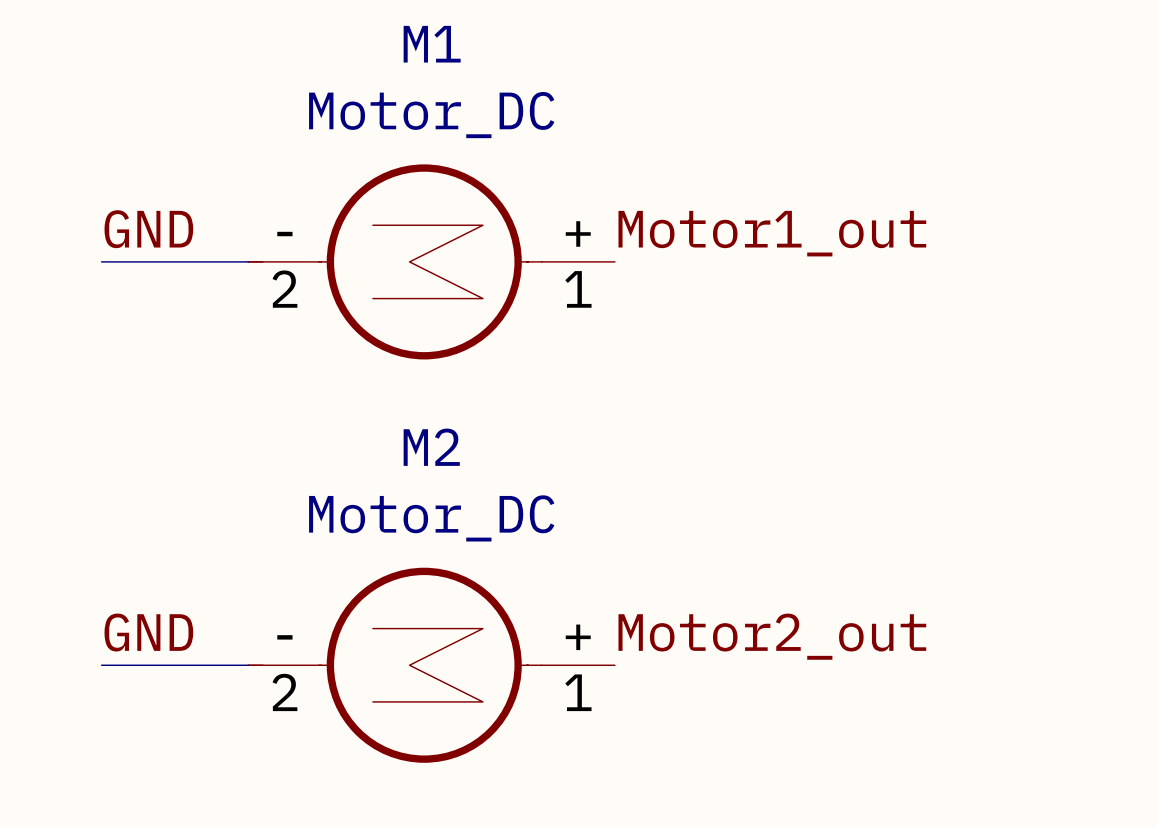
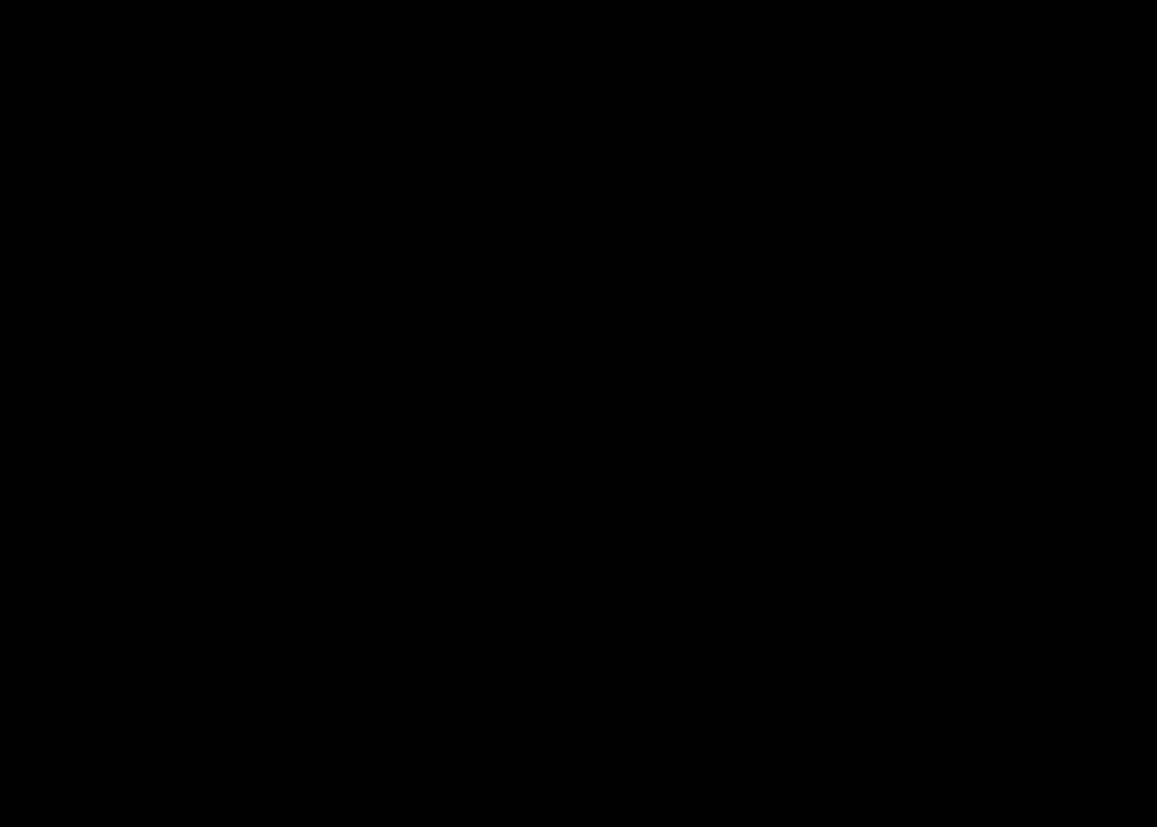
label: GND (148, 229) -> none
label: Motor1_out (772, 233) -> none
wire: (101, 261) (248, 261) -> none
M1: Motor_DC (431, 261) -> none
label: GND (148, 632) -> none
label: Motor2_out (772, 636) -> none
wire: (101, 665) (248, 665) -> none
M2: Motor_DC (431, 665) -> none

